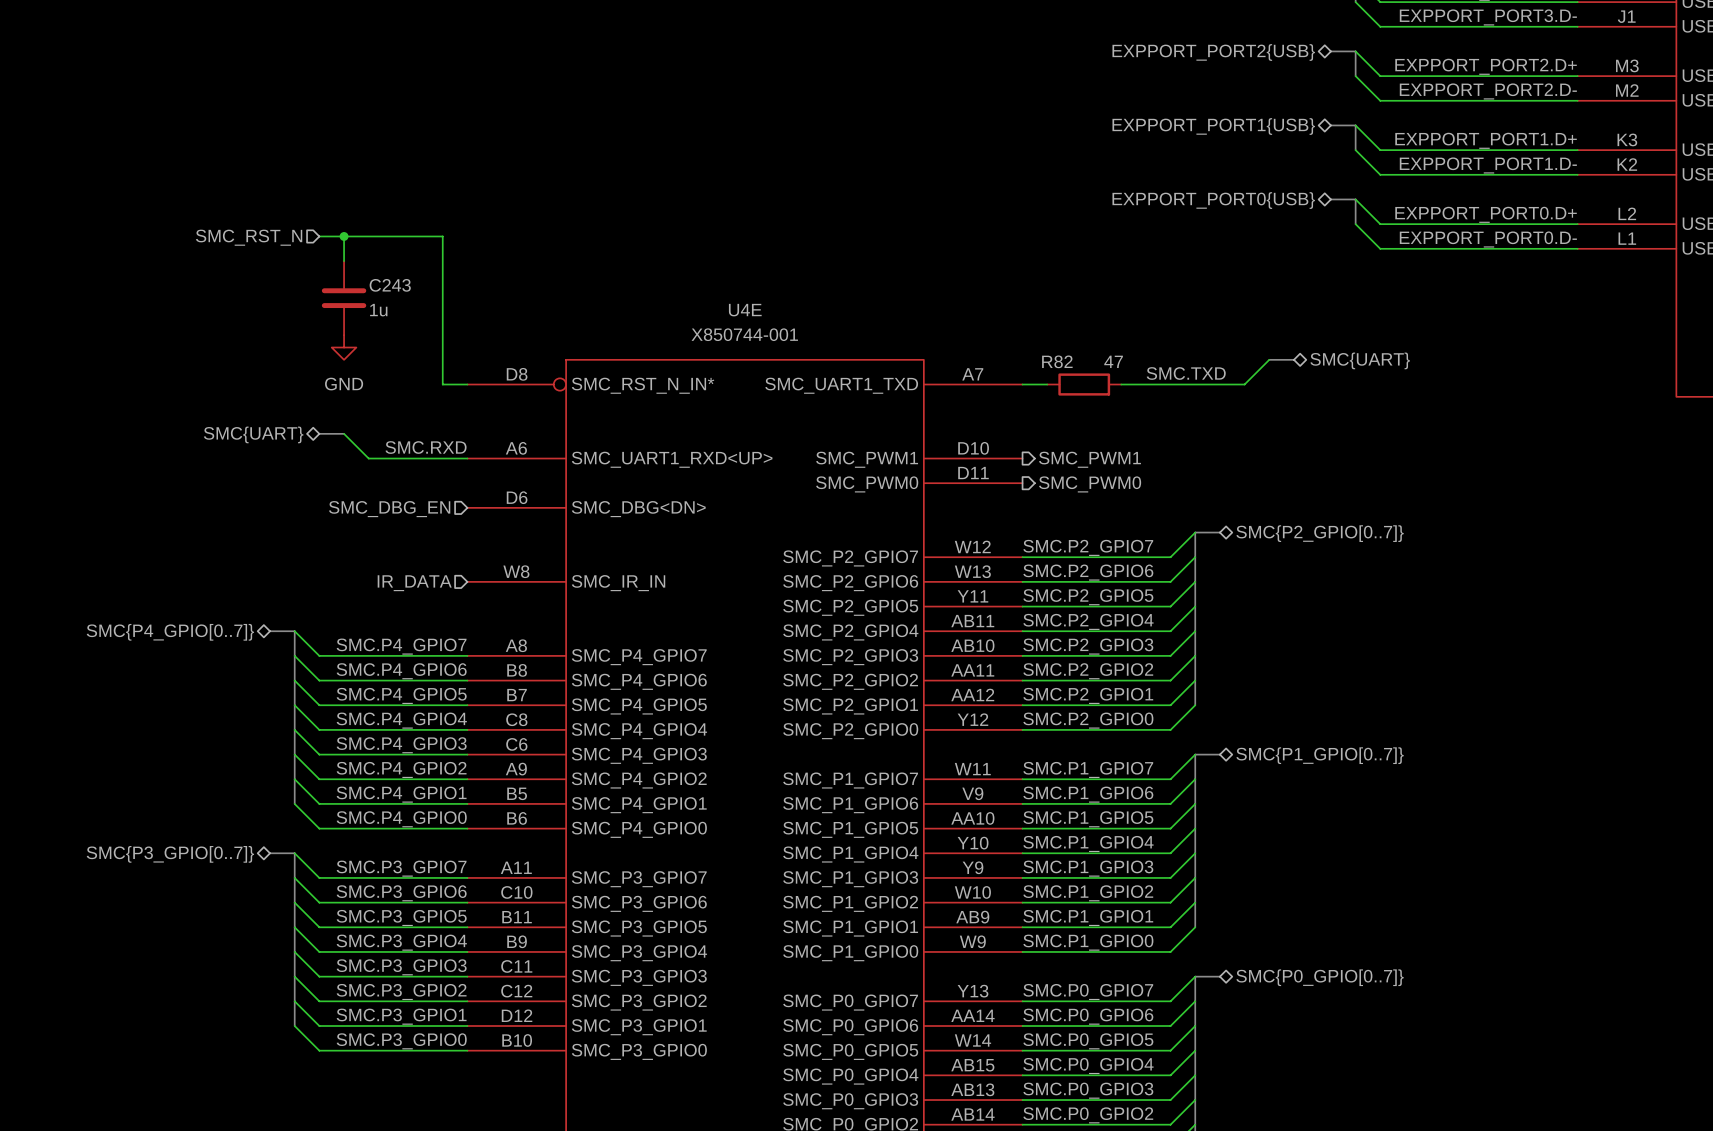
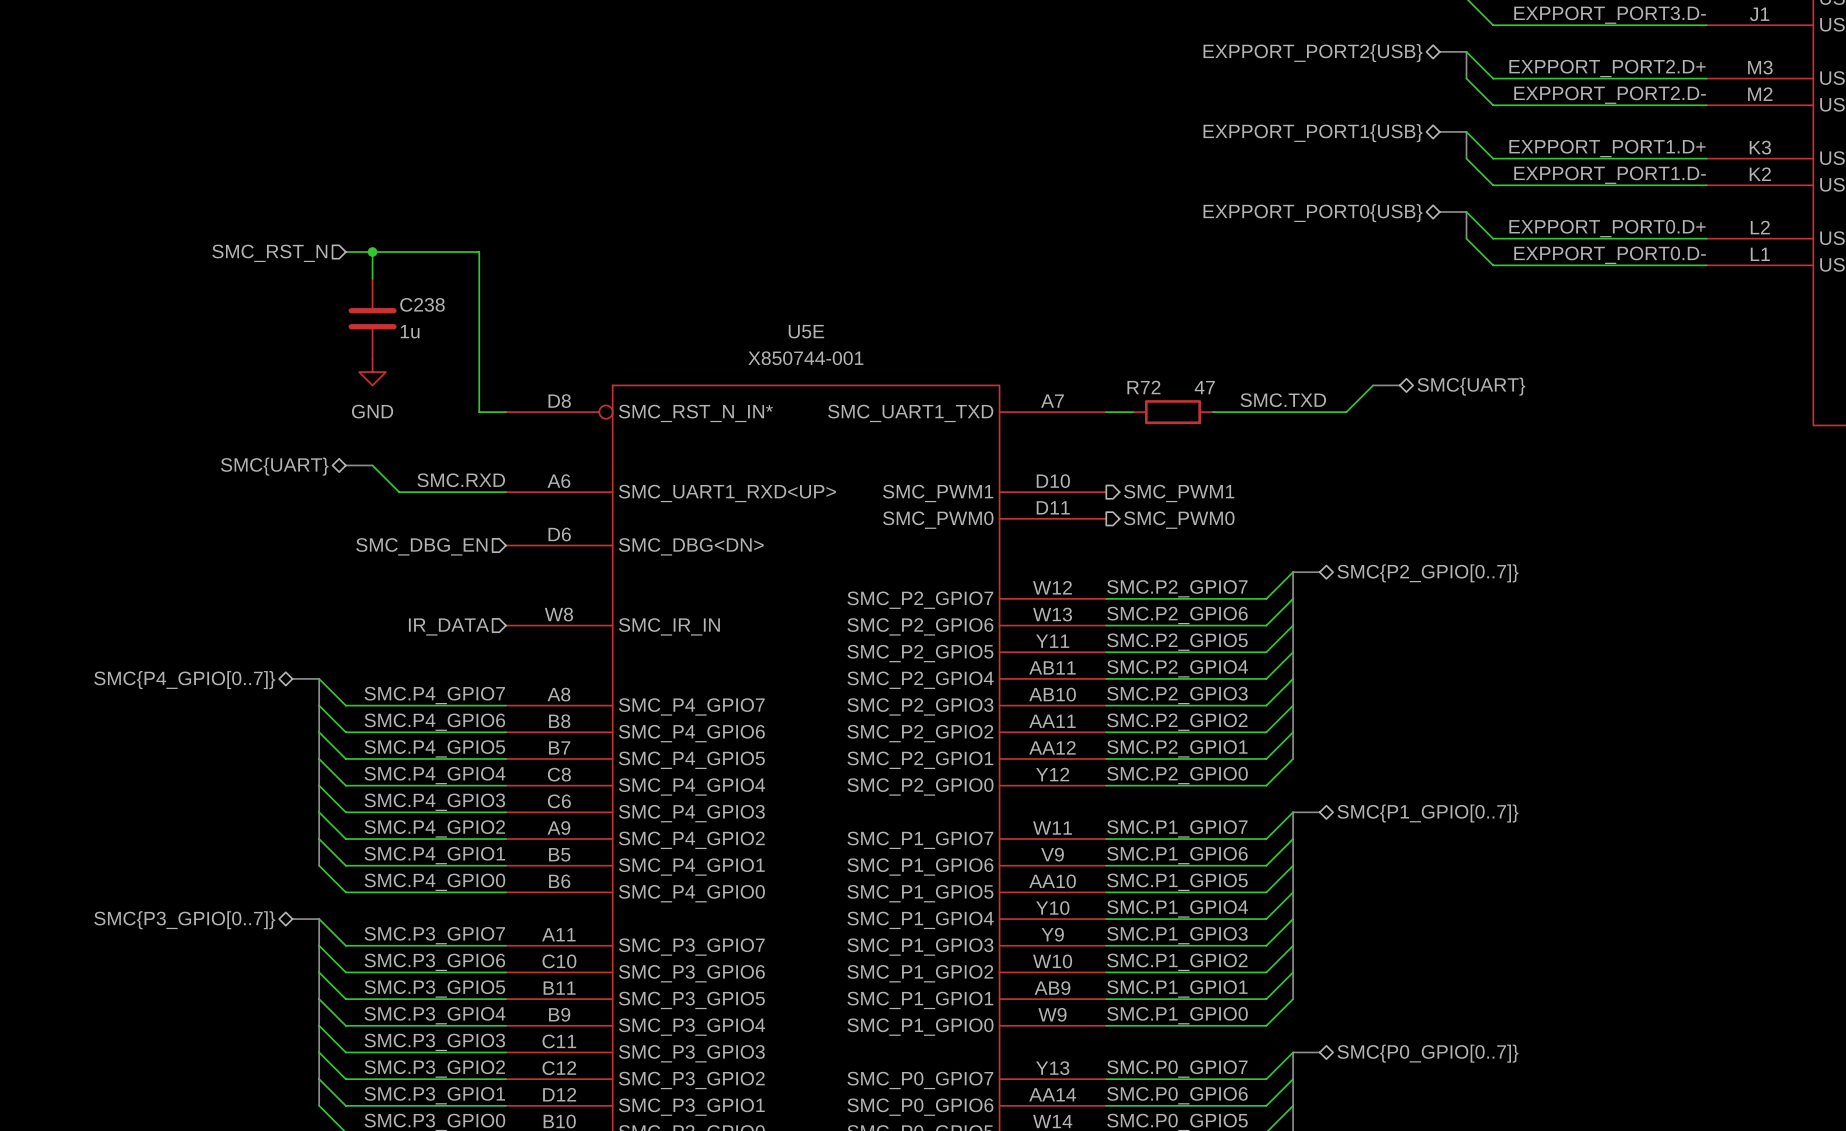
C243 name: C243 (390, 285) -> C238 (422, 304)
U4E name: U4E (745, 310) -> U5E (806, 331)
R82 name: R82 (1057, 361) -> R72 (1143, 387)

